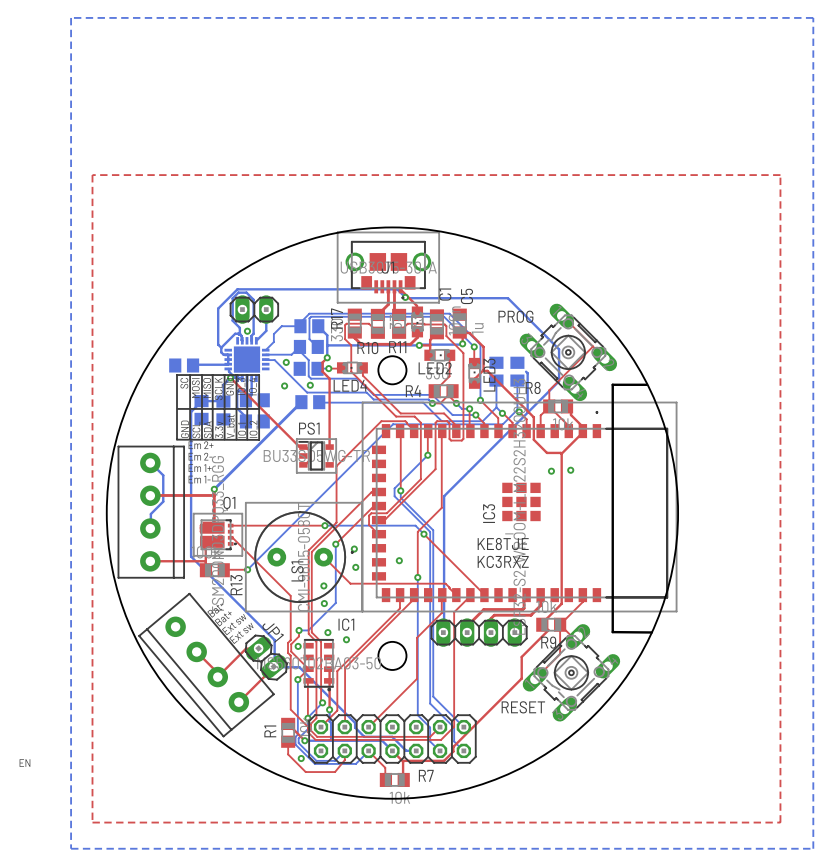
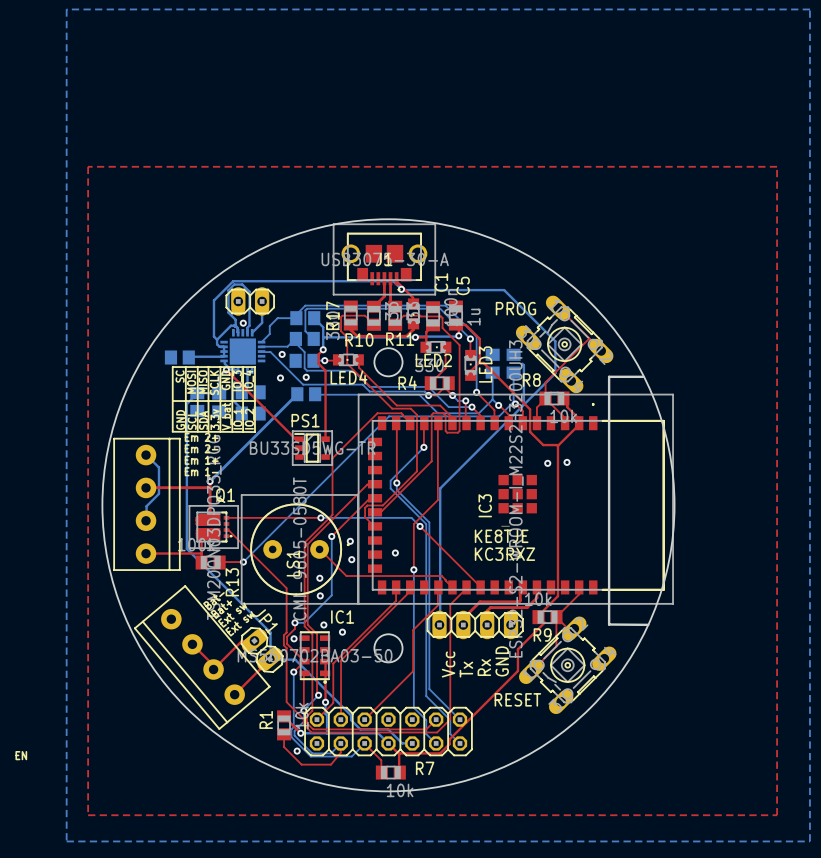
text: none -> GND (502, 661)
text: none -> Vcc (448, 664)
text: none -> Tx (466, 669)
text: none -> Rx (484, 667)

